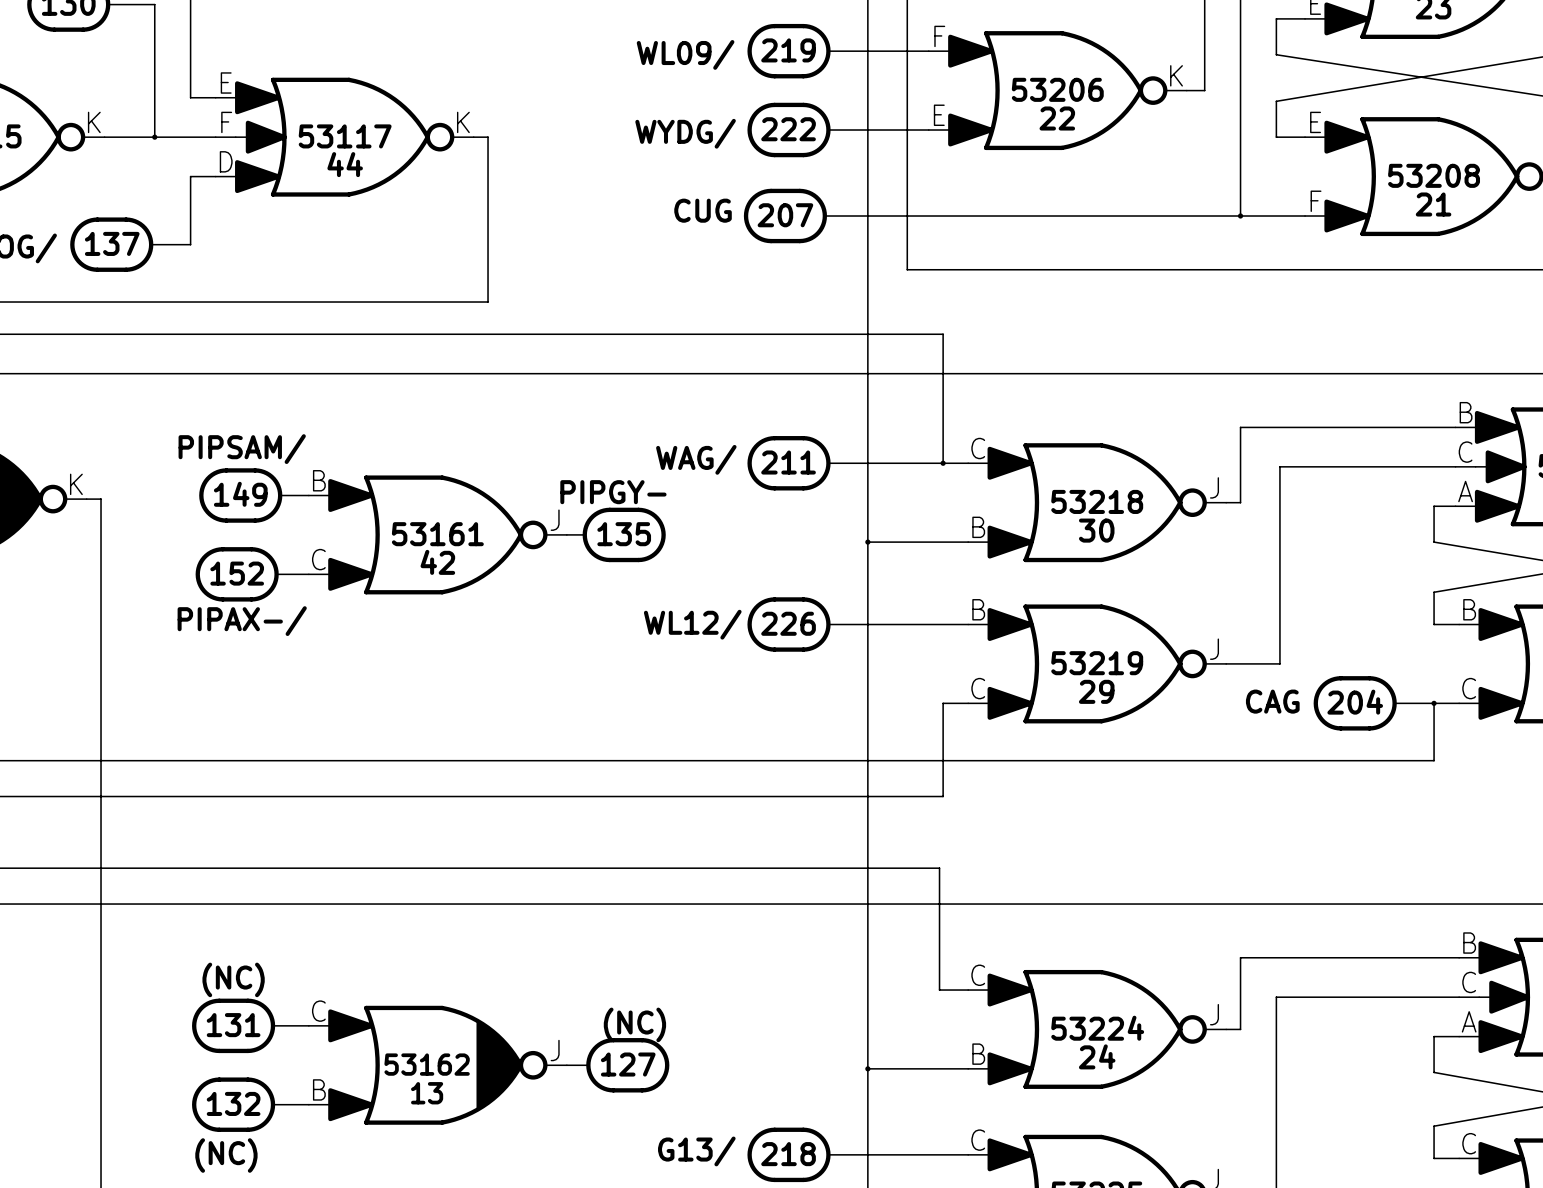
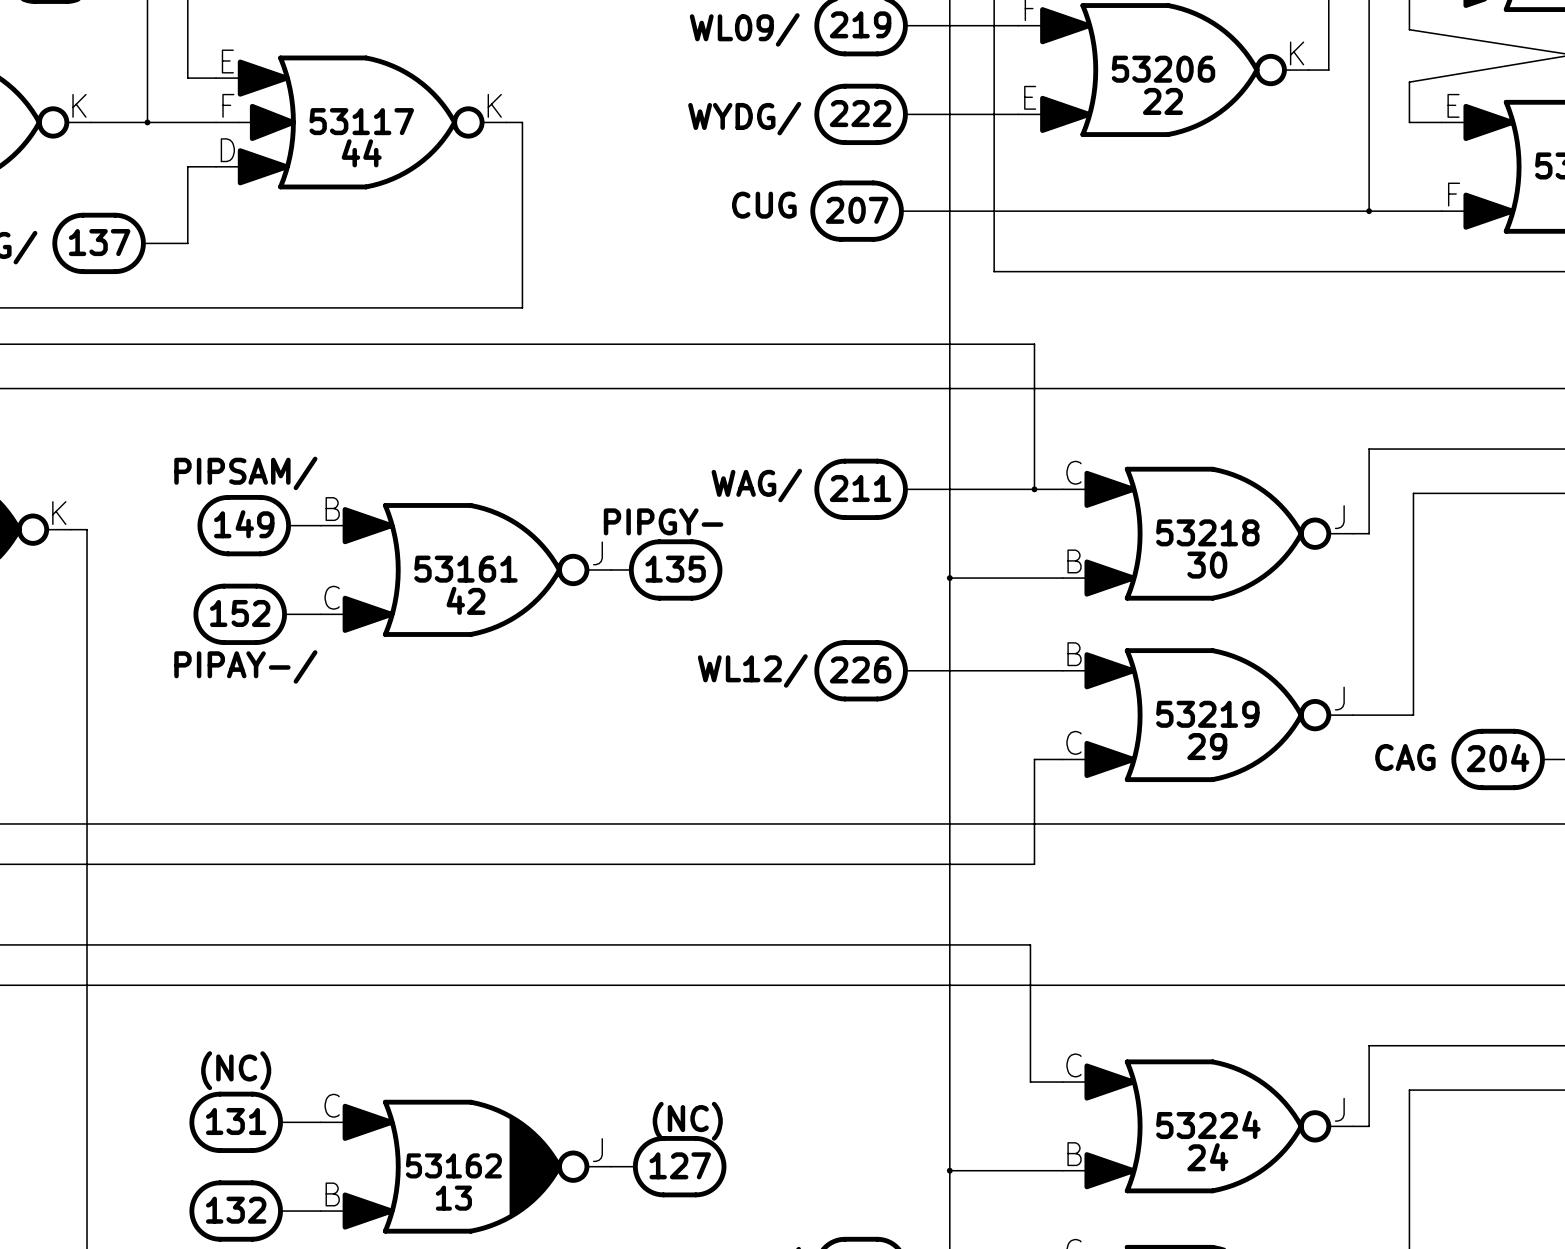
part text: PIPAX-/ (242, 621) -> PIPAY-/ (245, 666)

